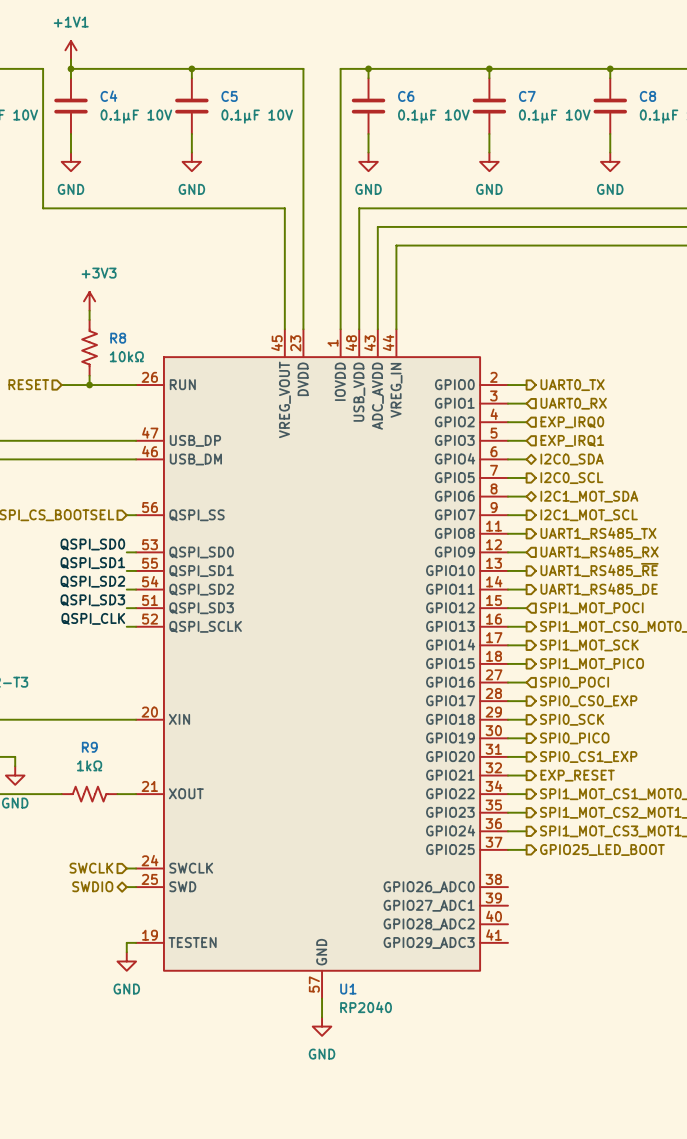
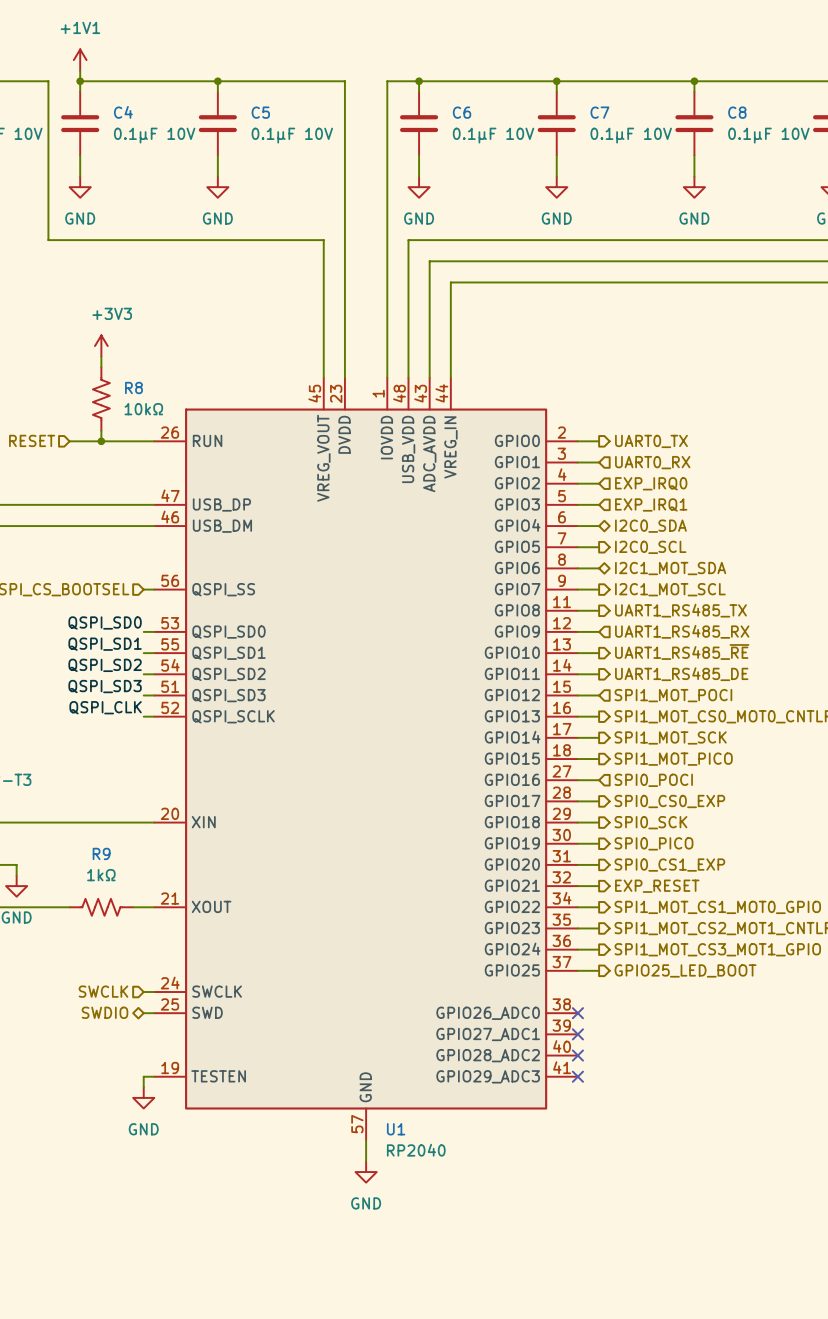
no-connect mark: none -> (577, 1013)
no-connect mark: none -> (577, 1034)
no-connect mark: none -> (577, 1055)
no-connect mark: none -> (577, 1076)

